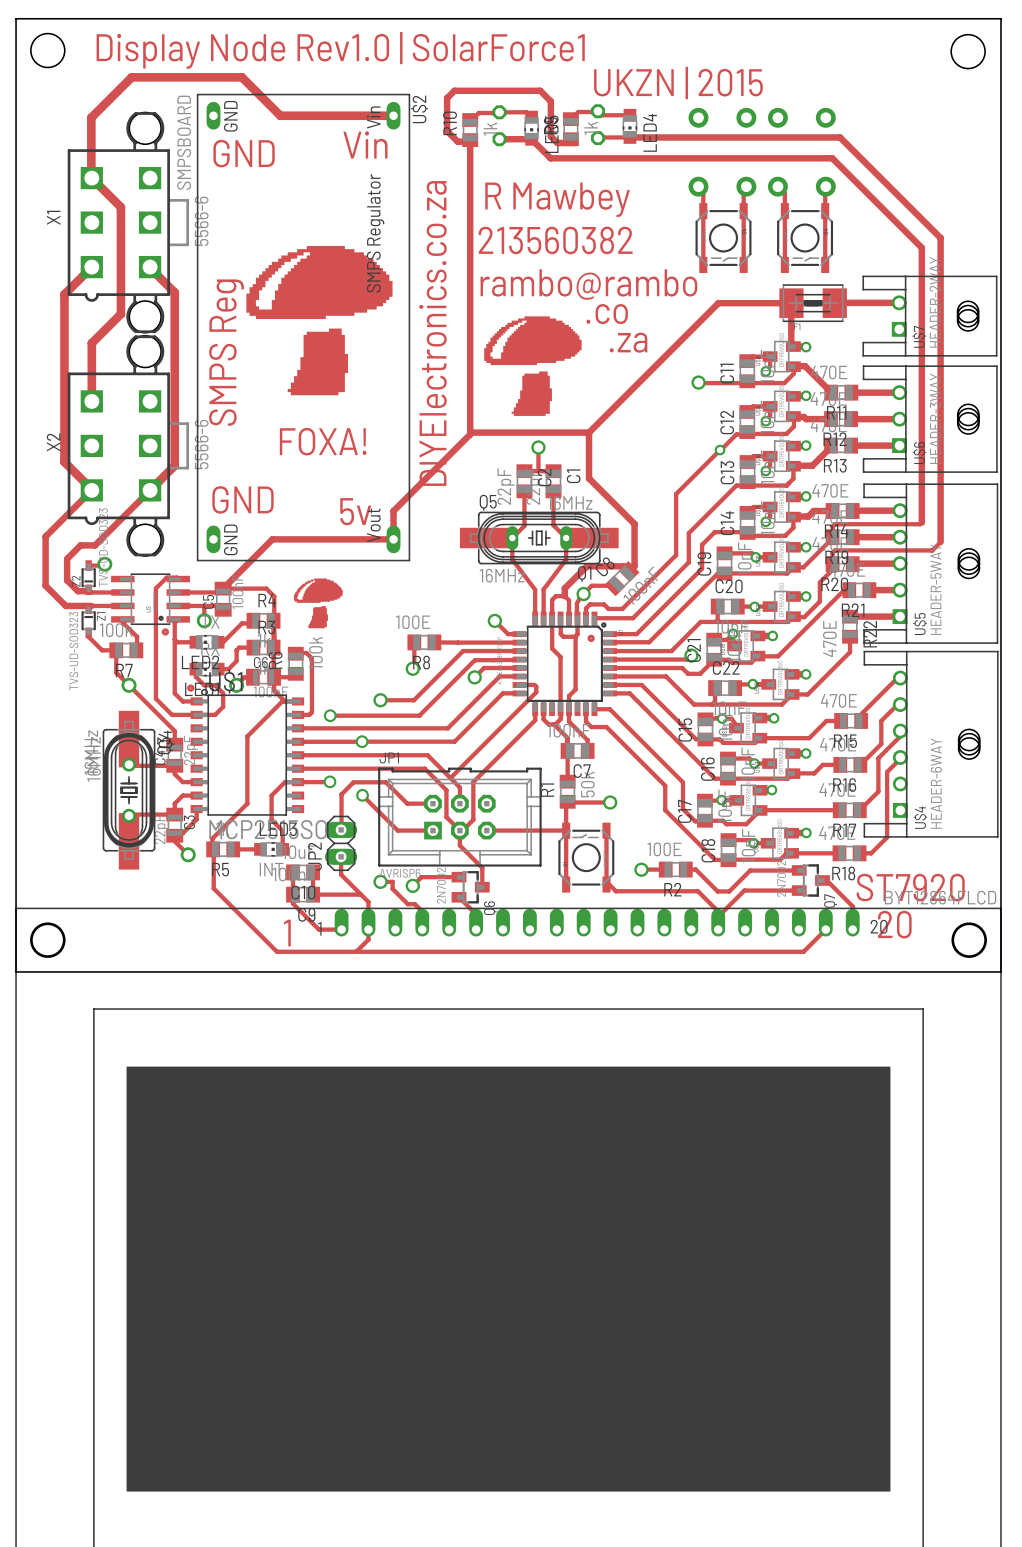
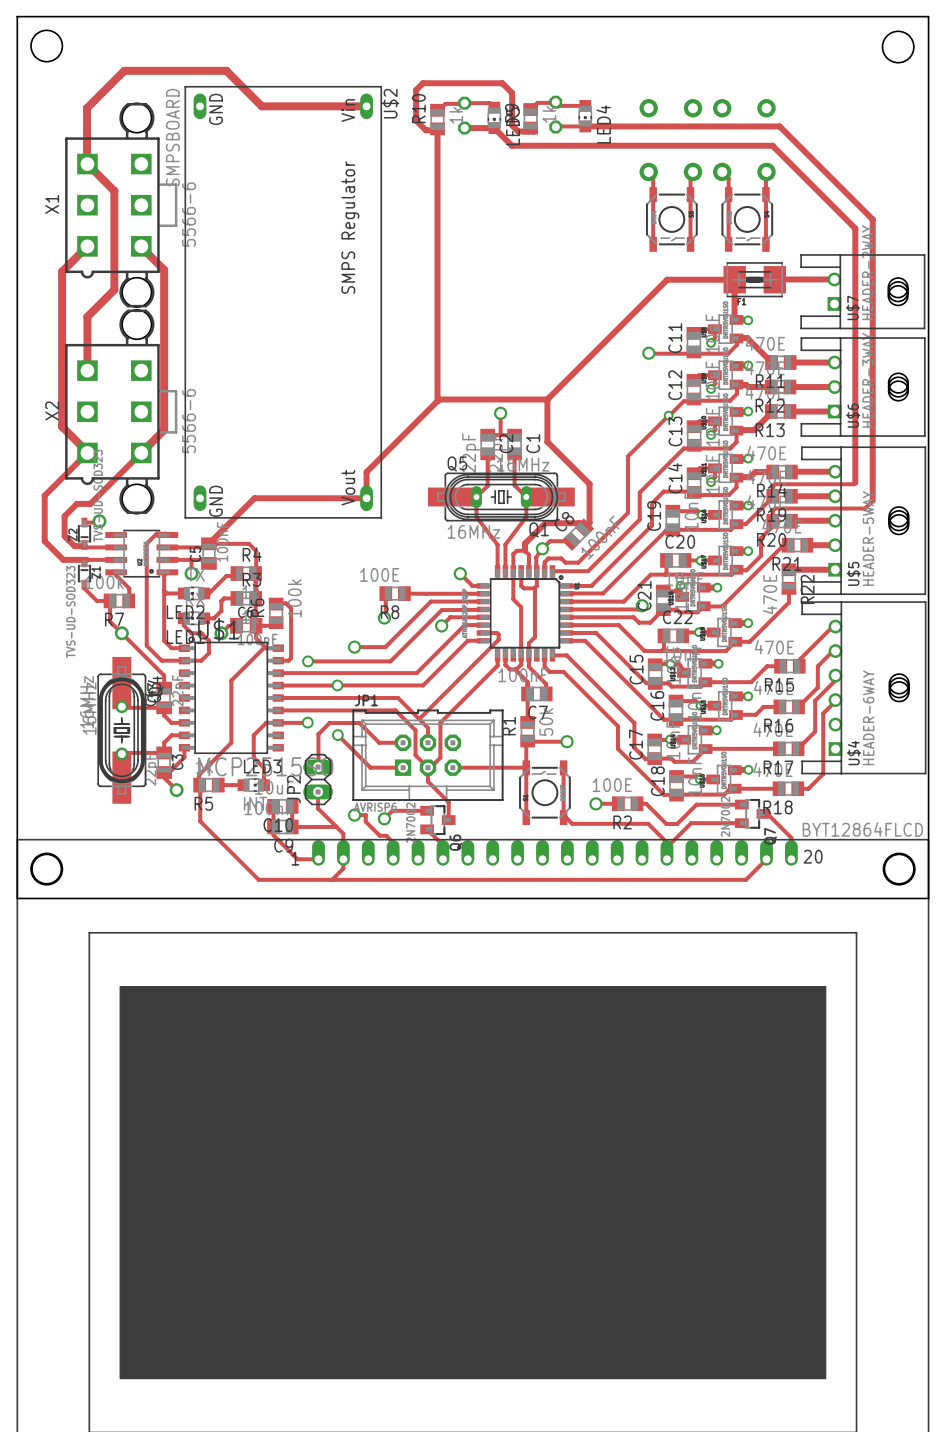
text: Display Node Rev1.0 | SolarForce1 (340, 50) -> none
text: UKZN | 2015 (678, 83) -> none
text: Vin (365, 144) -> none
text: GND (244, 153) -> none
text: R Mawbey (557, 199) -> none
text: 213560382 (555, 240) -> none
drawing: [246, 245, 393, 396] -> none
text: rambo@rambo (588, 284) -> none
text: .co (607, 314) -> none
drawing: [484, 316, 582, 416] -> none
text: DIYElectronics.co.za (432, 333) -> none
text: .za (628, 342) -> none
text: SMPS Reg (226, 352) -> none
text: FOXA! (323, 441) -> none
text: GND (242, 499) -> none
text: 5v (355, 511) -> none
drawing: [294, 578, 343, 629] -> none
drawing: [161, 628, 170, 636] -> none
drawing: [587, 634, 595, 642] -> none
drawing: [187, 684, 195, 692] -> none
text: ST7920 (910, 887) -> none
text: 20 (894, 924) -> none
text: 1 (287, 933) -> none

